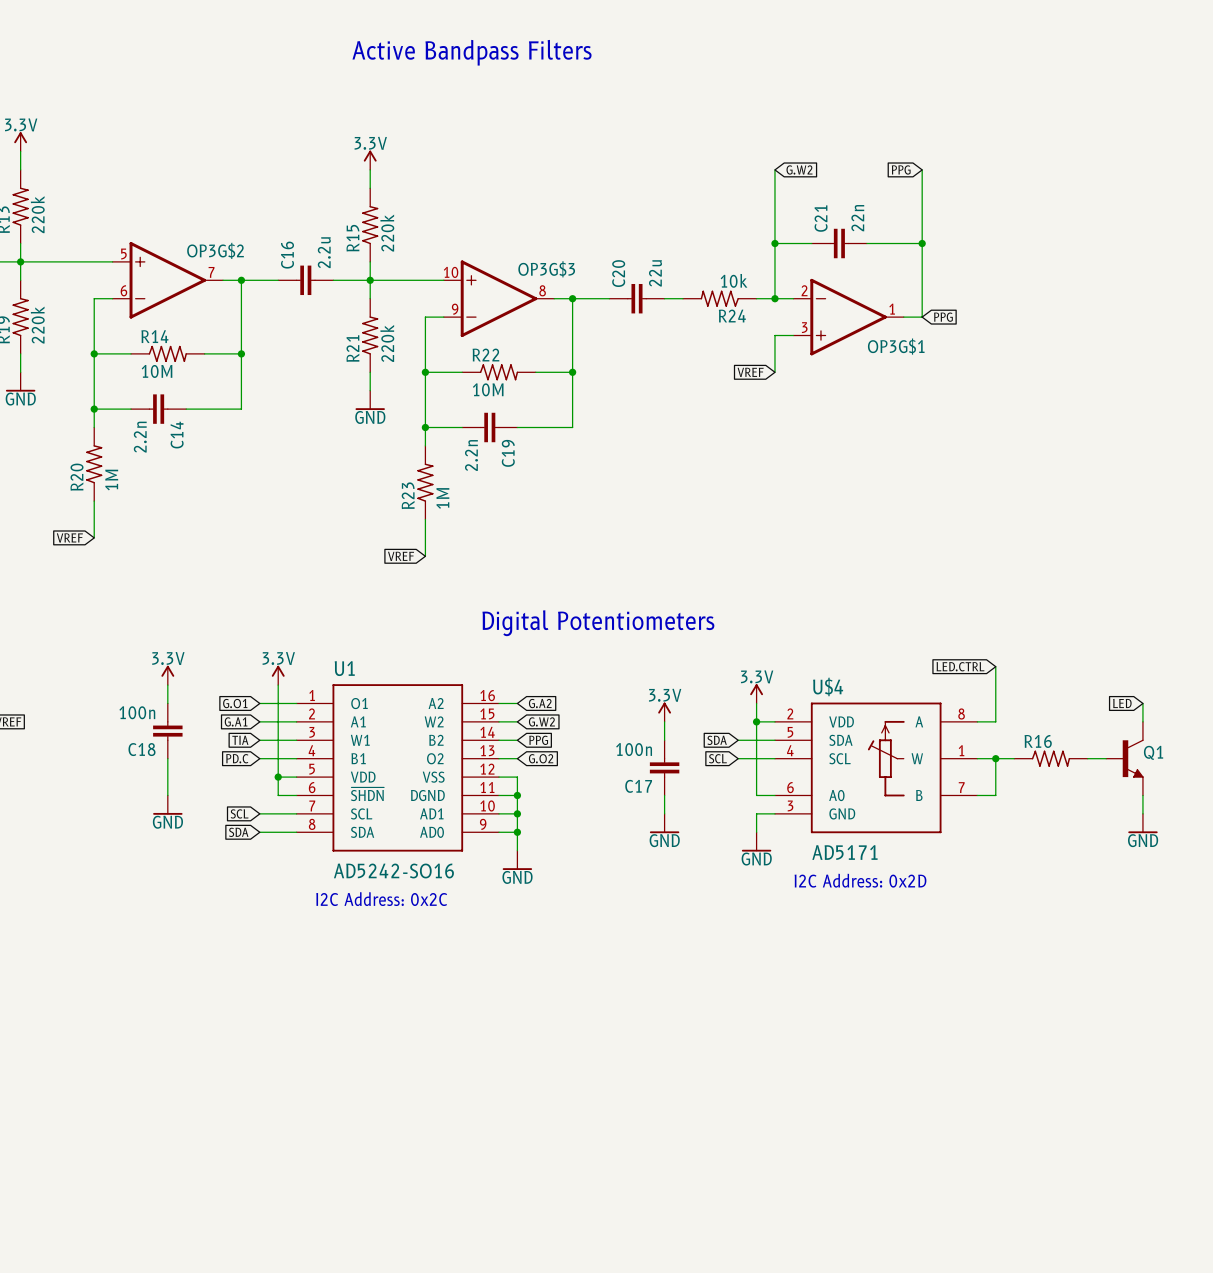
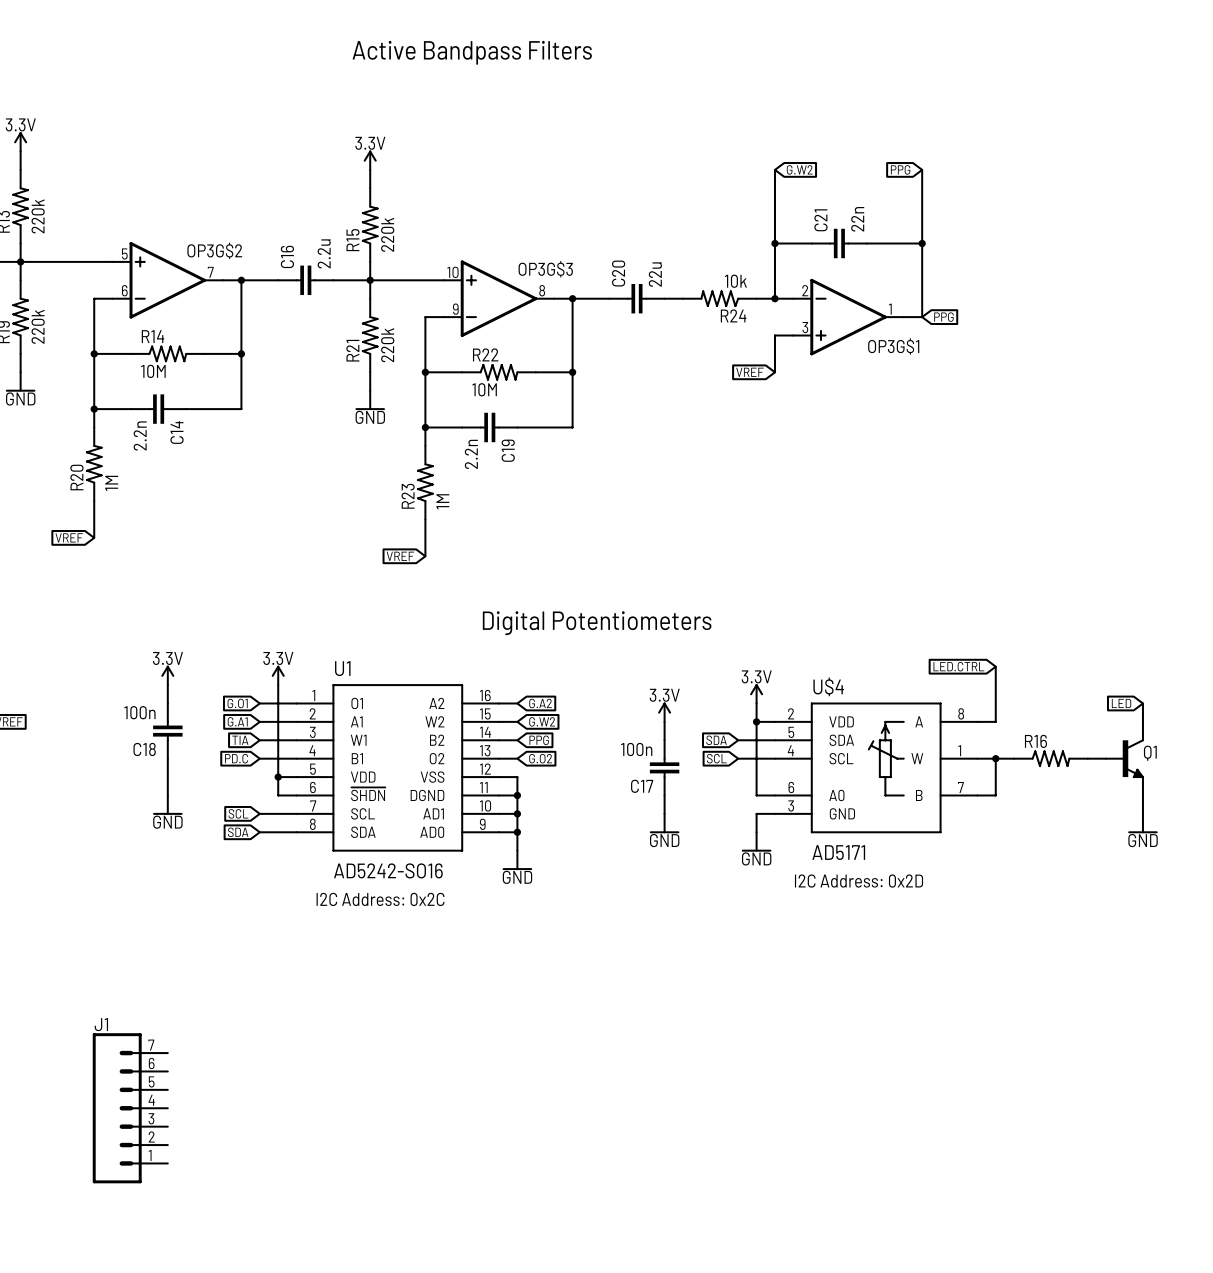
J1: none -> (130, 1108)

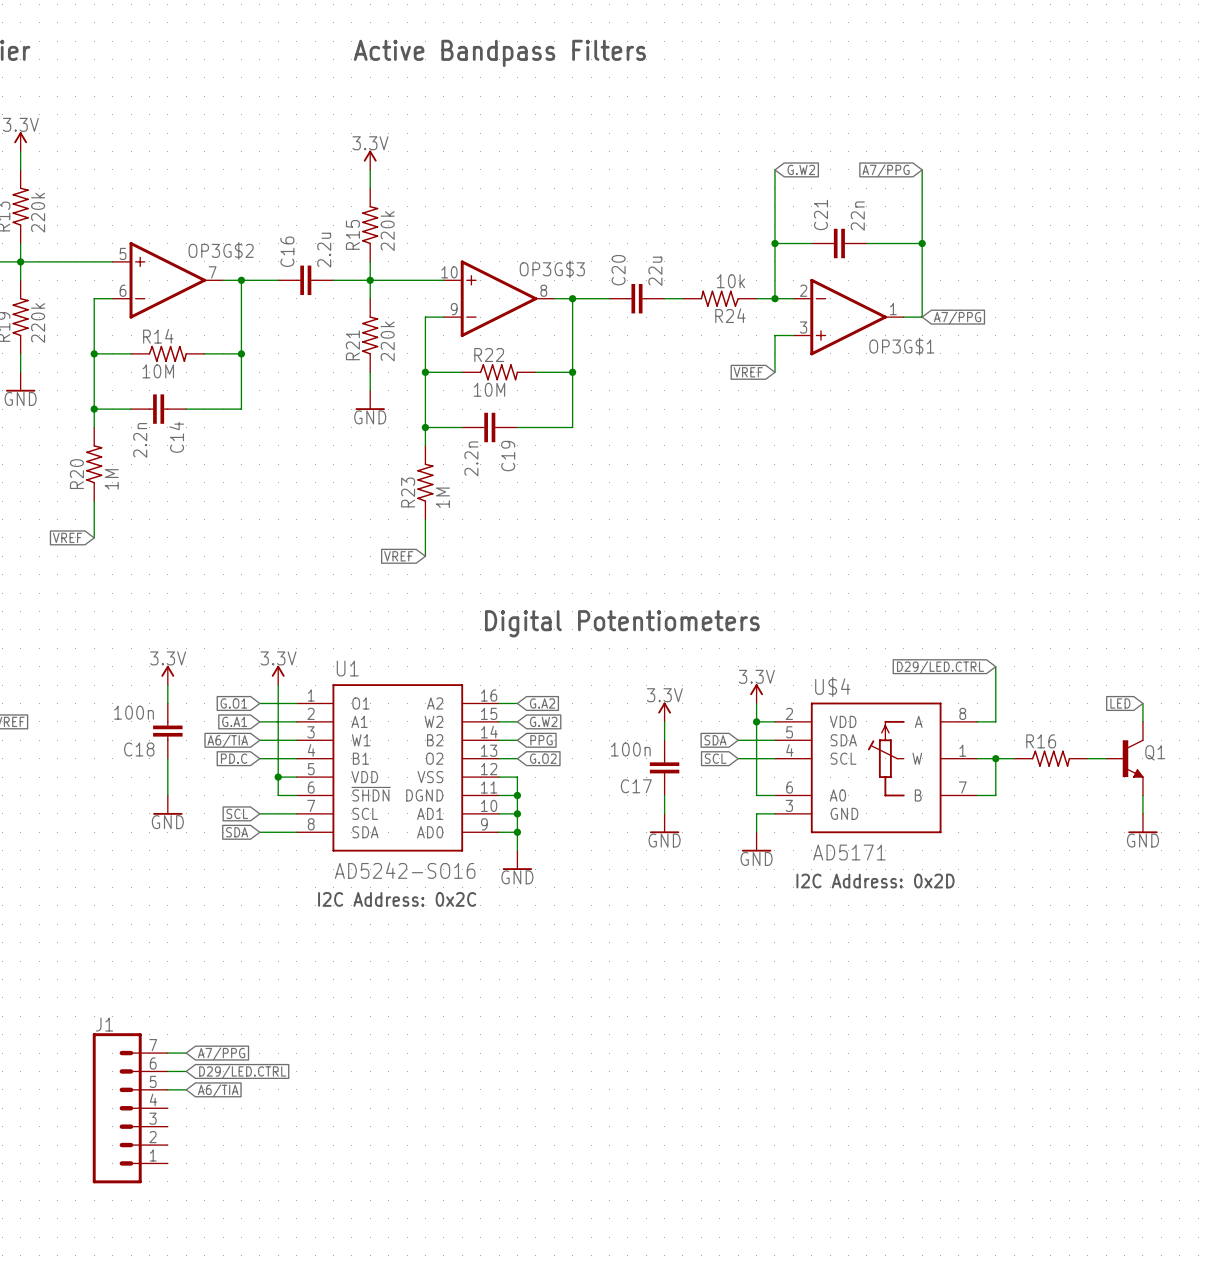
global label: PPG (900, 169) -> A7/PPG (886, 170)
global label: PPG (943, 317) -> A7/PPG (957, 317)
global label: LED.CTRL (958, 666) -> D29/LED.CTRL (940, 667)
global label: TIA (240, 740) -> A6/TIA (227, 741)
wire: none -> (167, 1053) (186, 1053)
global label: none -> A7/PPG (221, 1053)
wire: none -> (167, 1071) (186, 1071)
global label: none -> D29/LED.CTRL (242, 1072)
wire: none -> (167, 1089) (186, 1089)
global label: none -> A6/TIA (218, 1090)

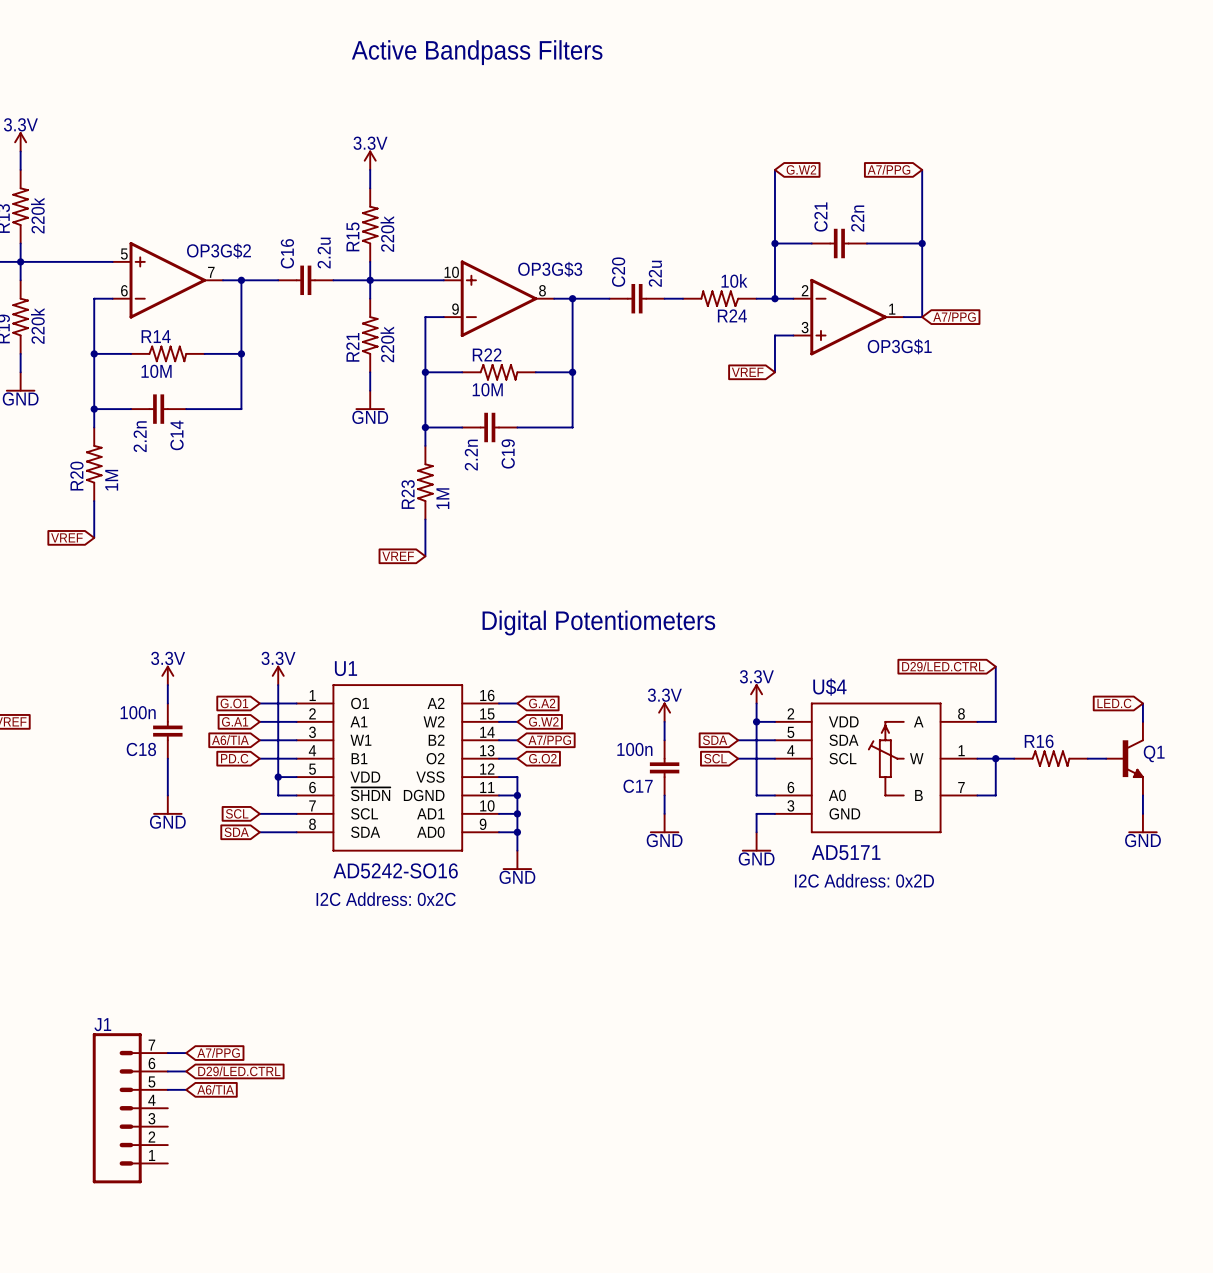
global label: LED (1120, 703) -> LED.C (1114, 703)
global label: PPG (541, 740) -> A7/PPG (549, 740)

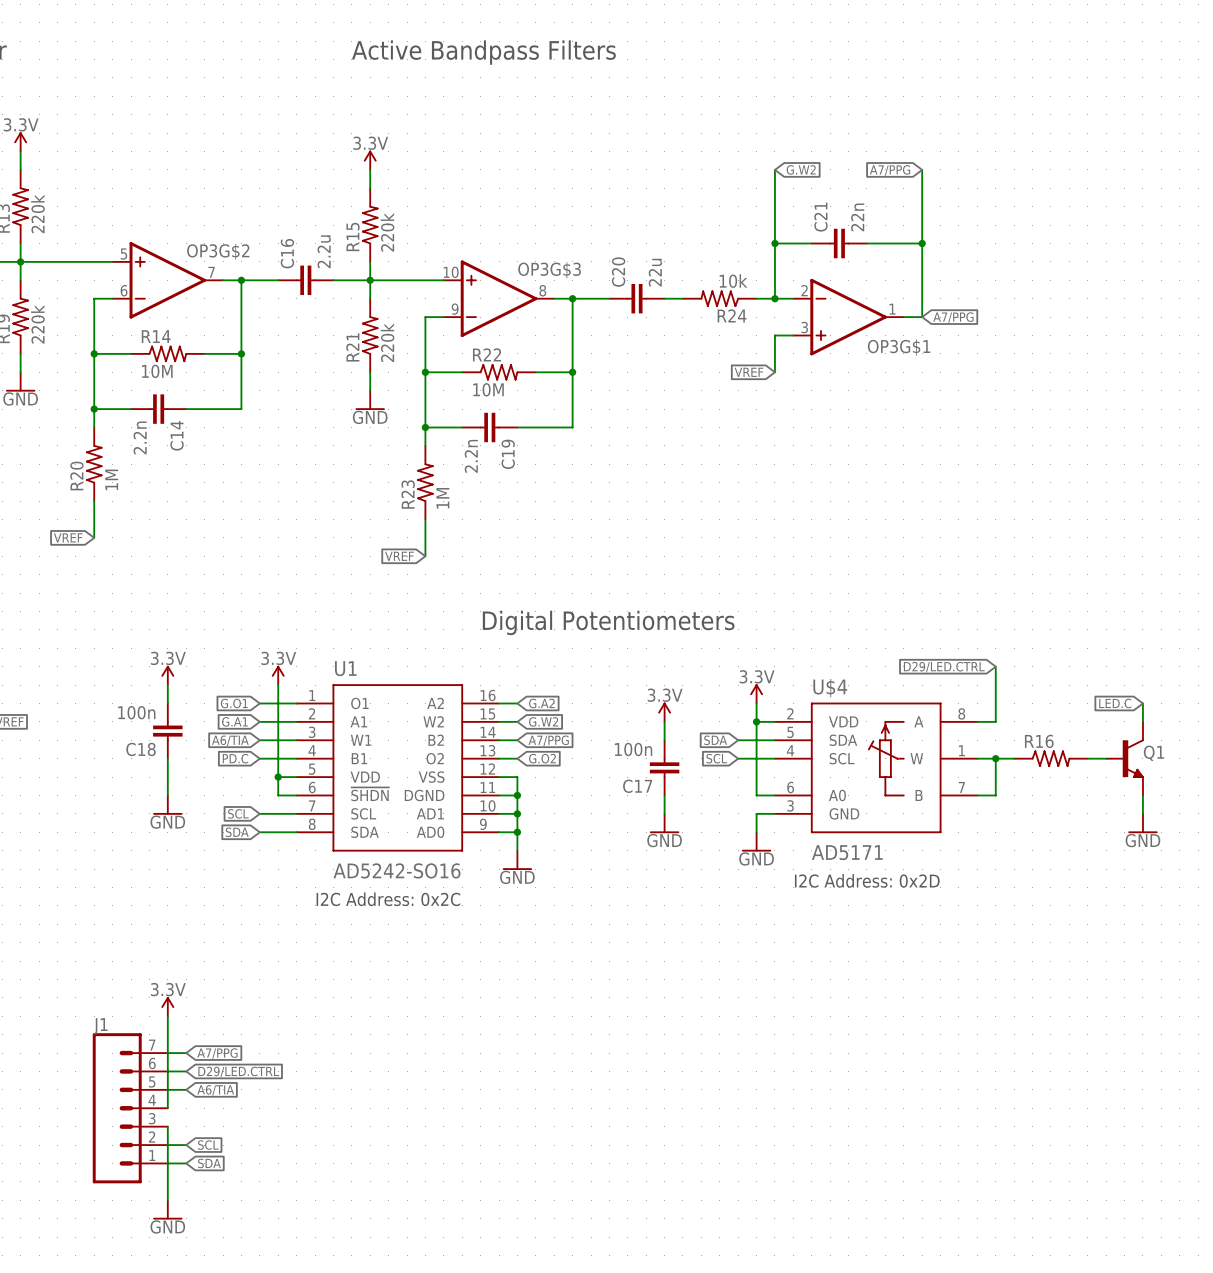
power symbol: none -> 3.3V (167, 1006)
wire: none -> (167, 1016) (167, 1108)
wire: none -> (167, 1126) (167, 1200)
wire: none -> (167, 1145) (186, 1145)
global label: none -> SCL (208, 1145)
wire: none -> (167, 1163) (186, 1163)
global label: none -> SDA (209, 1163)
power symbol: none -> GND (167, 1209)

